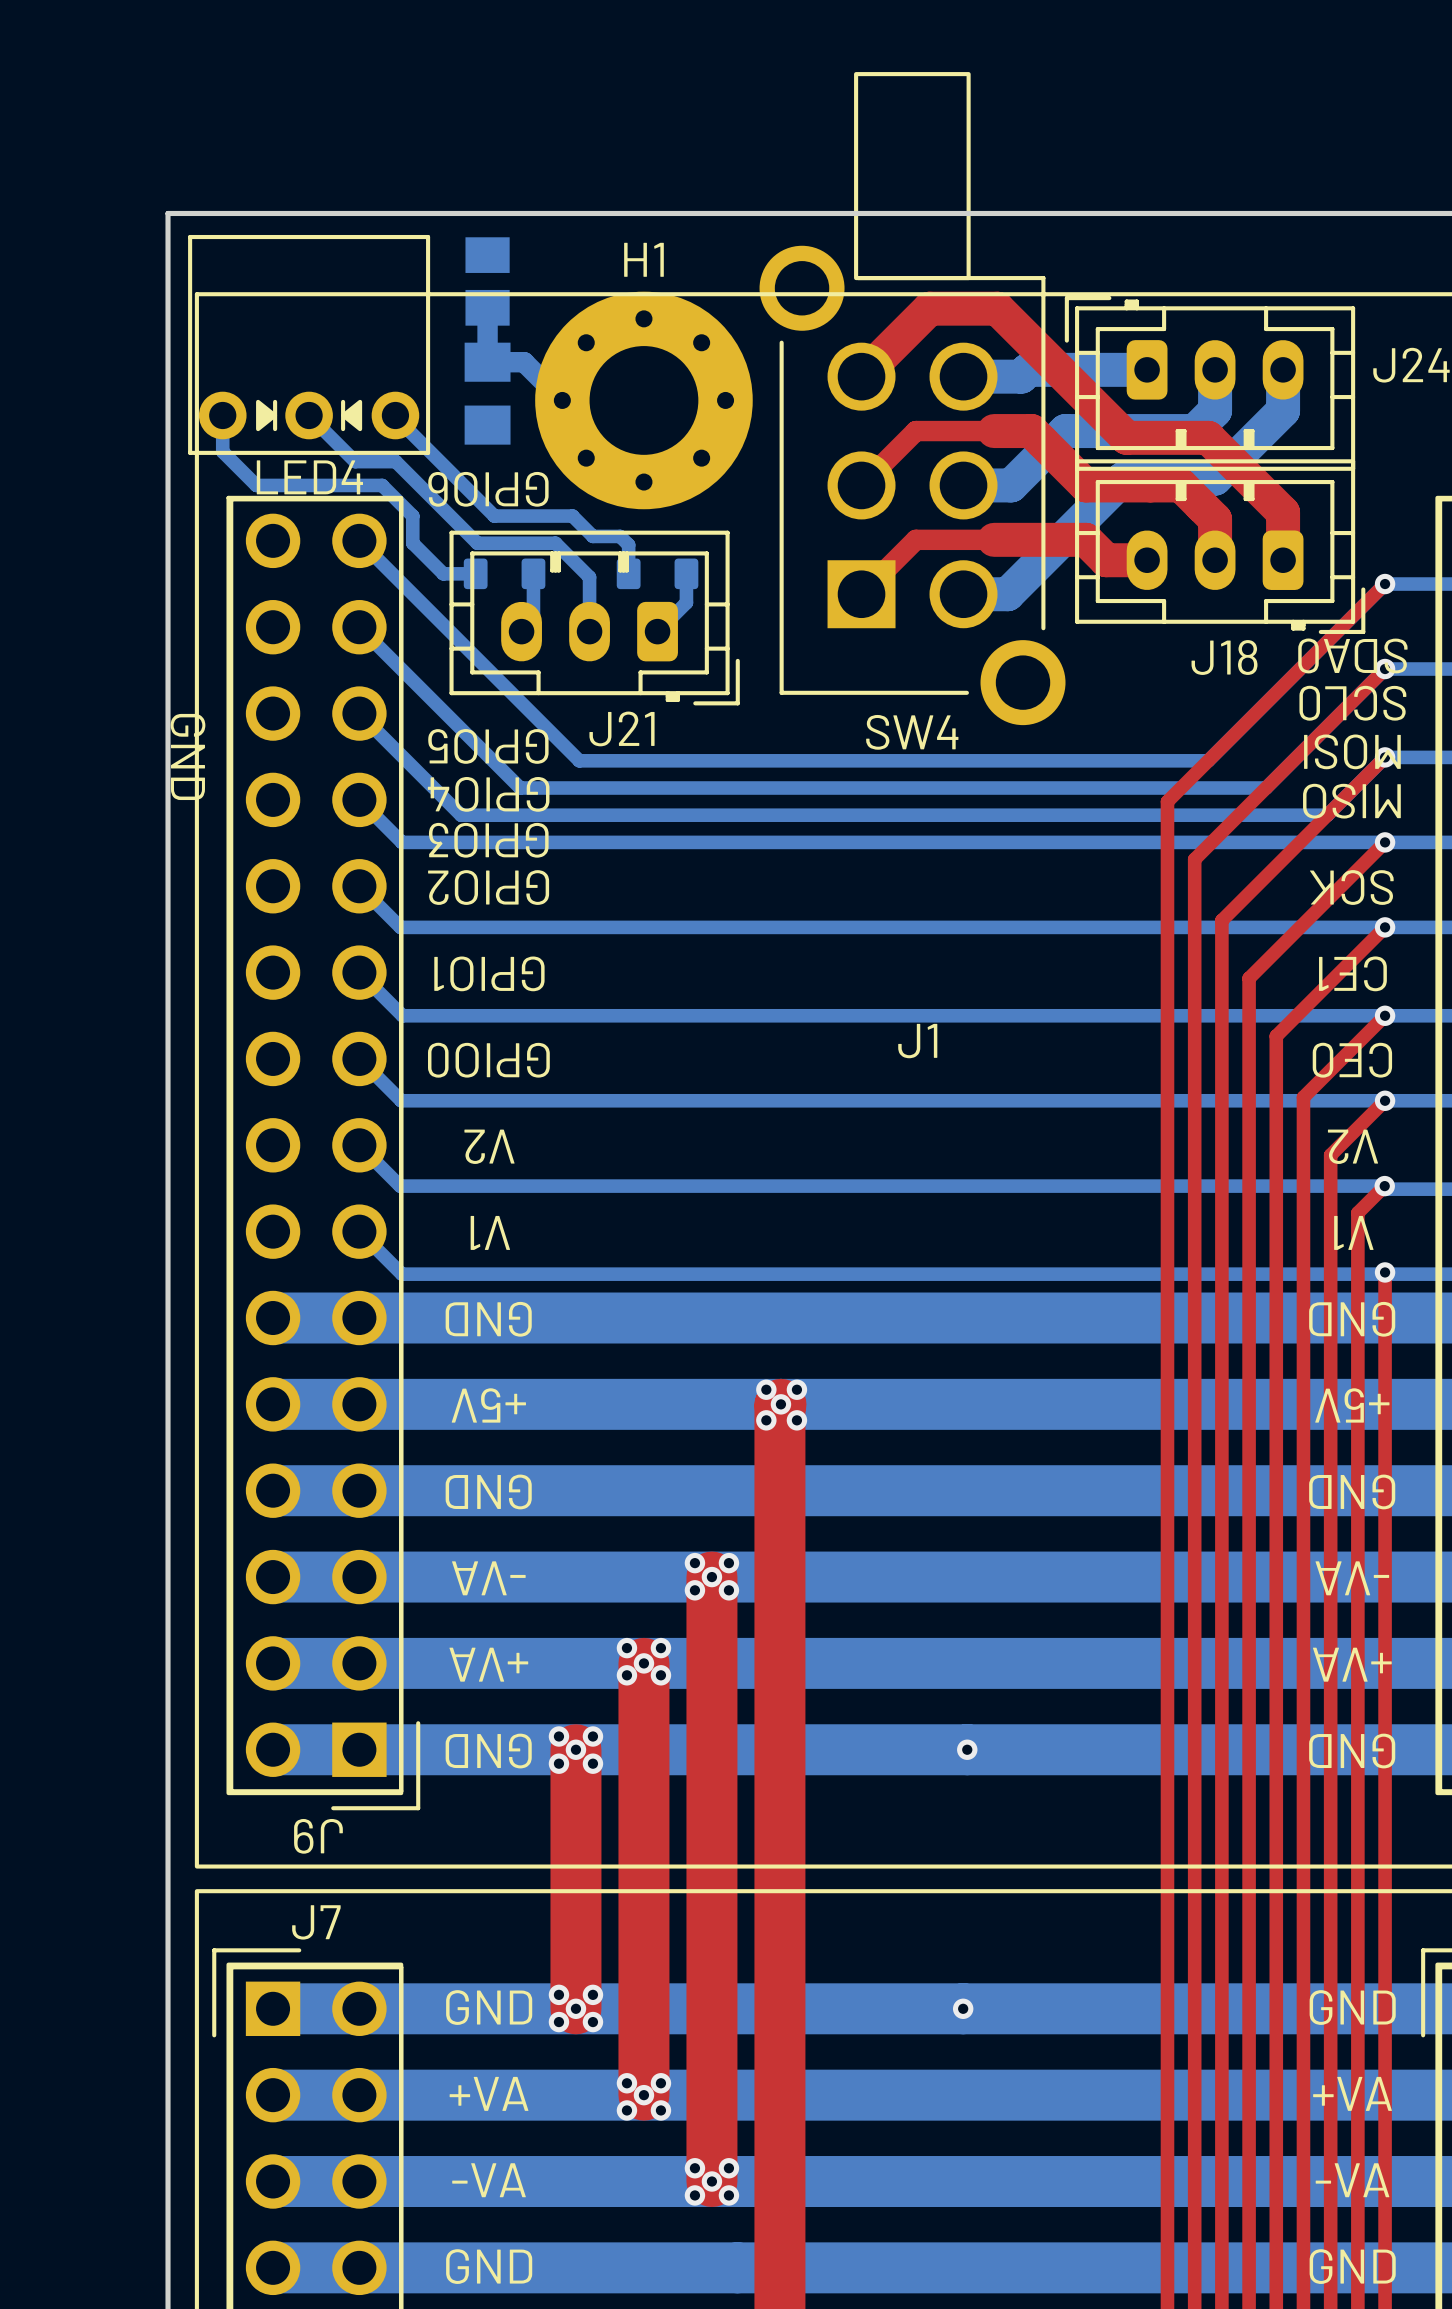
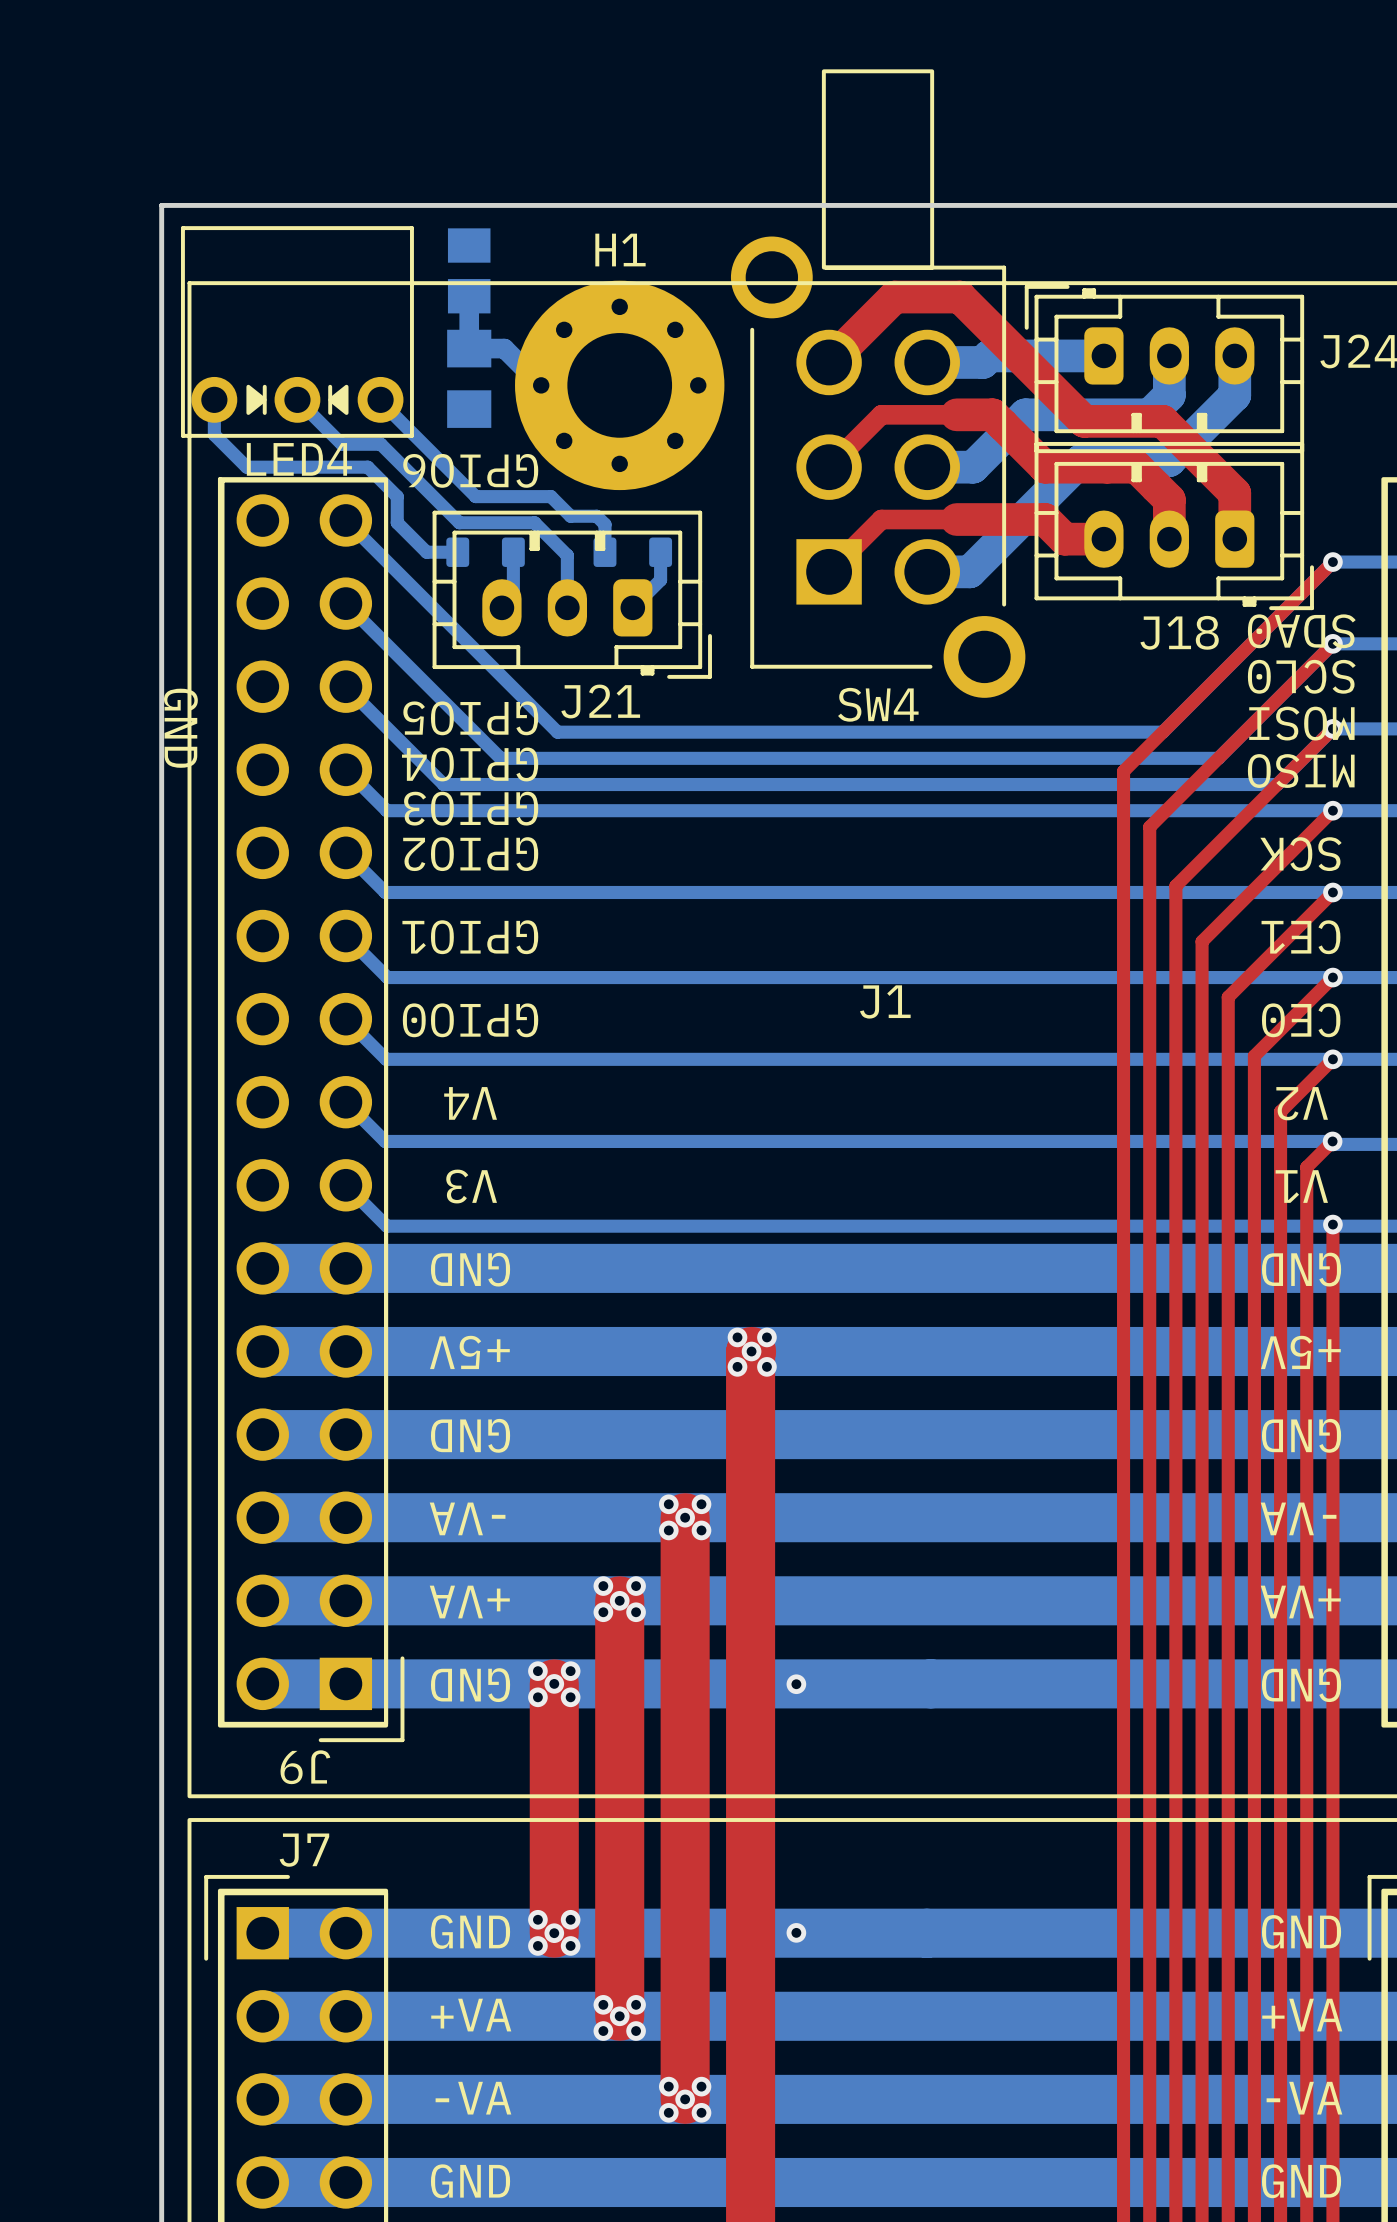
J9 text: V2 (489, 1146) -> V4 (470, 1103)
J9 text: V1 (490, 1232) -> V3 (471, 1186)
via position: (967, 1749) -> (796, 1684)
via position: (963, 2008) -> (796, 1932)

